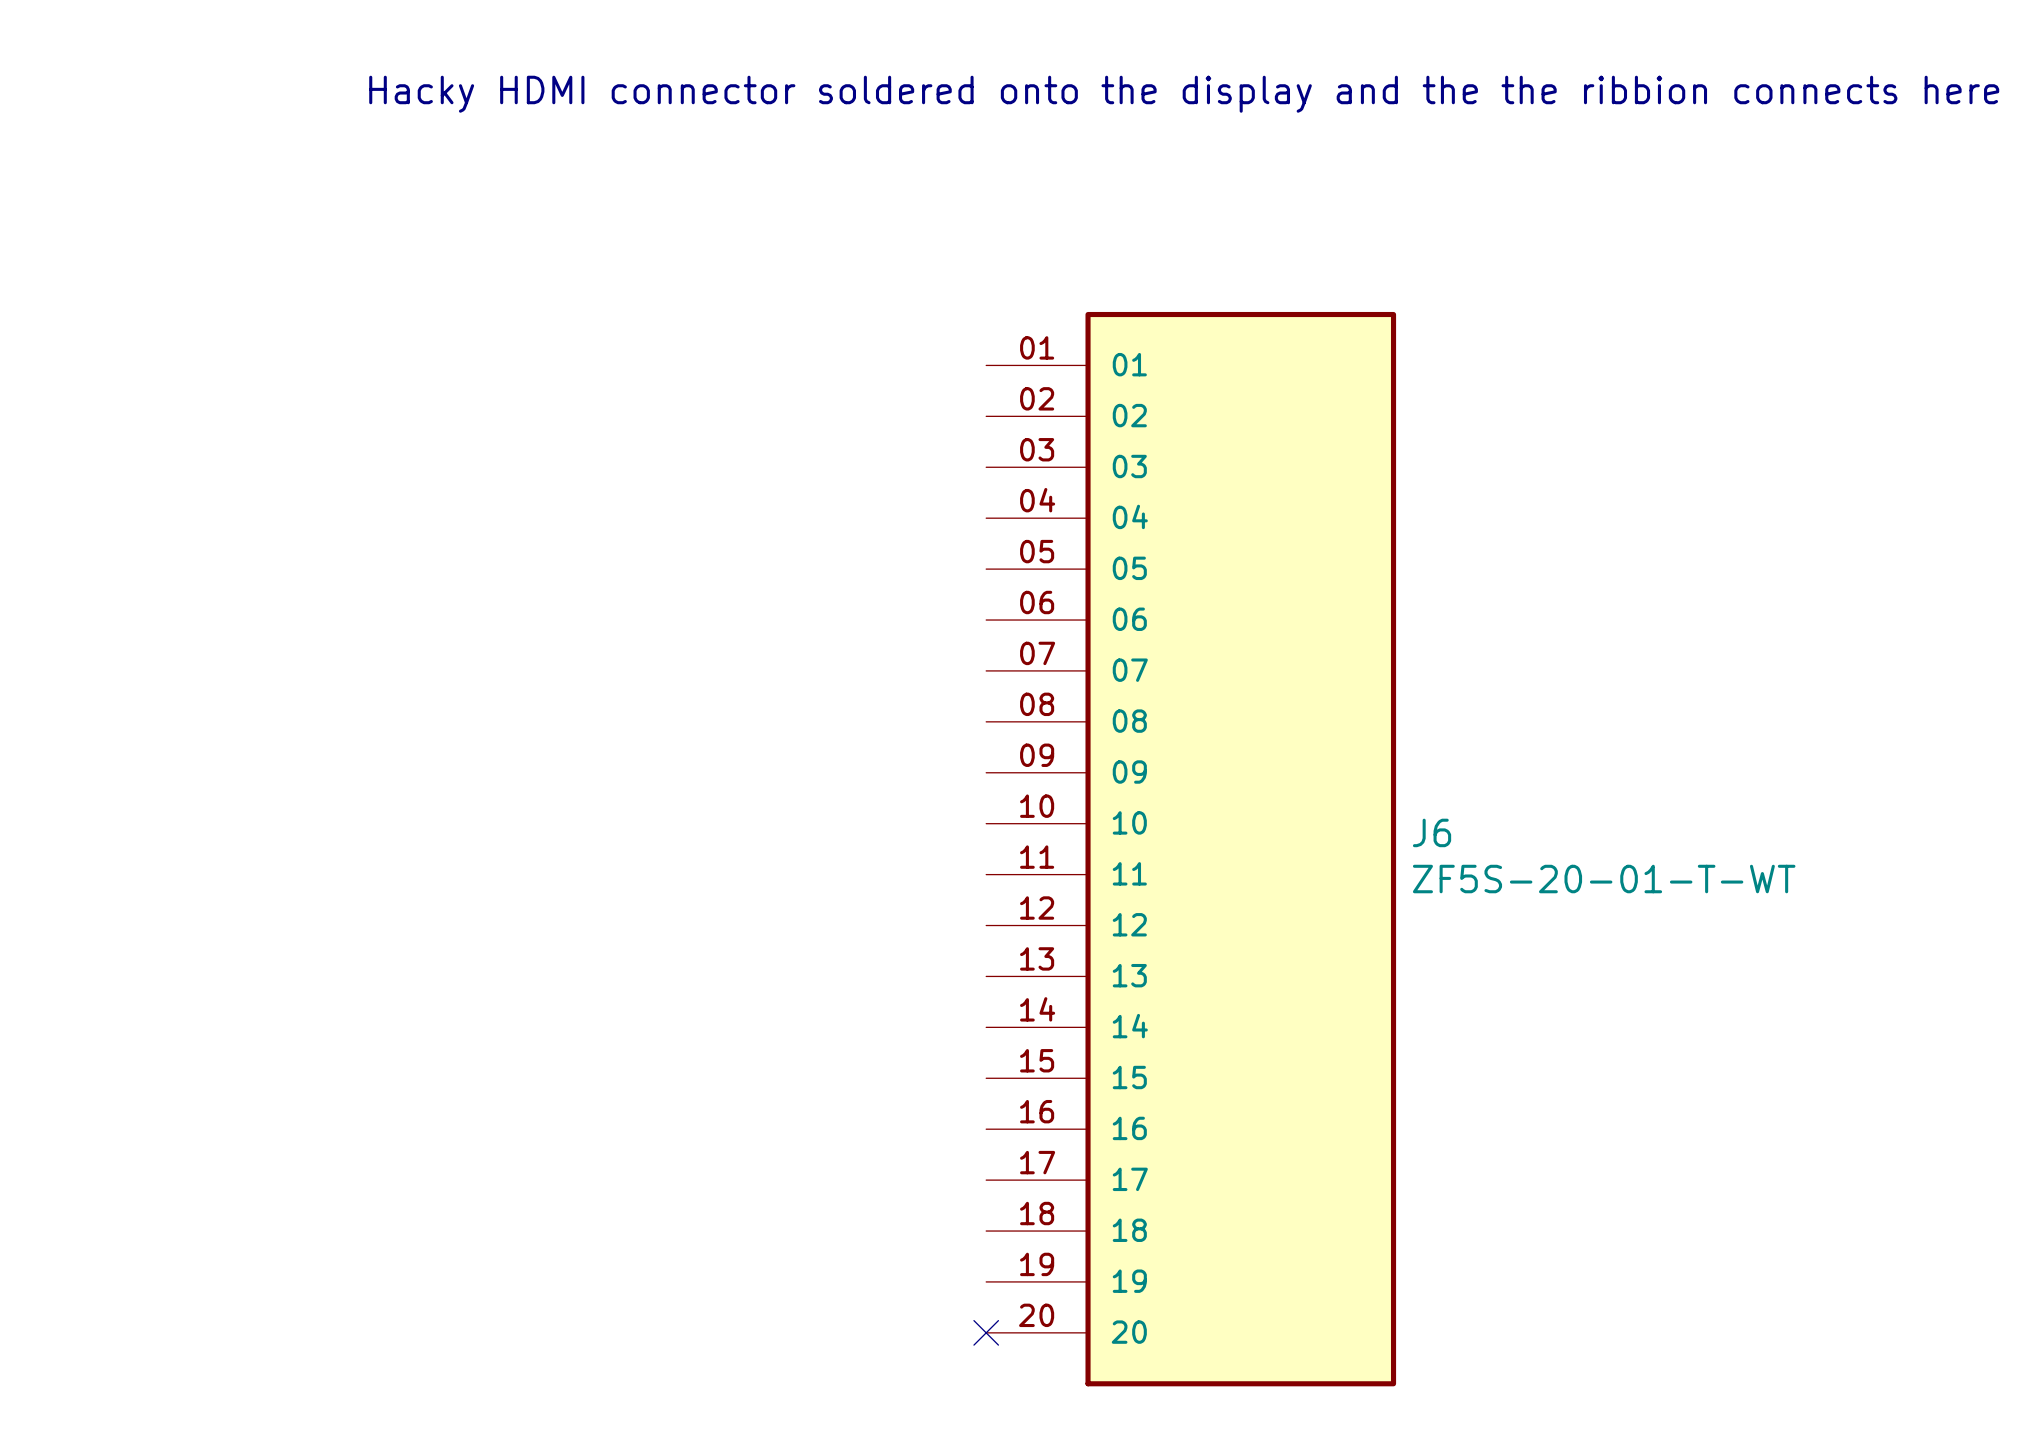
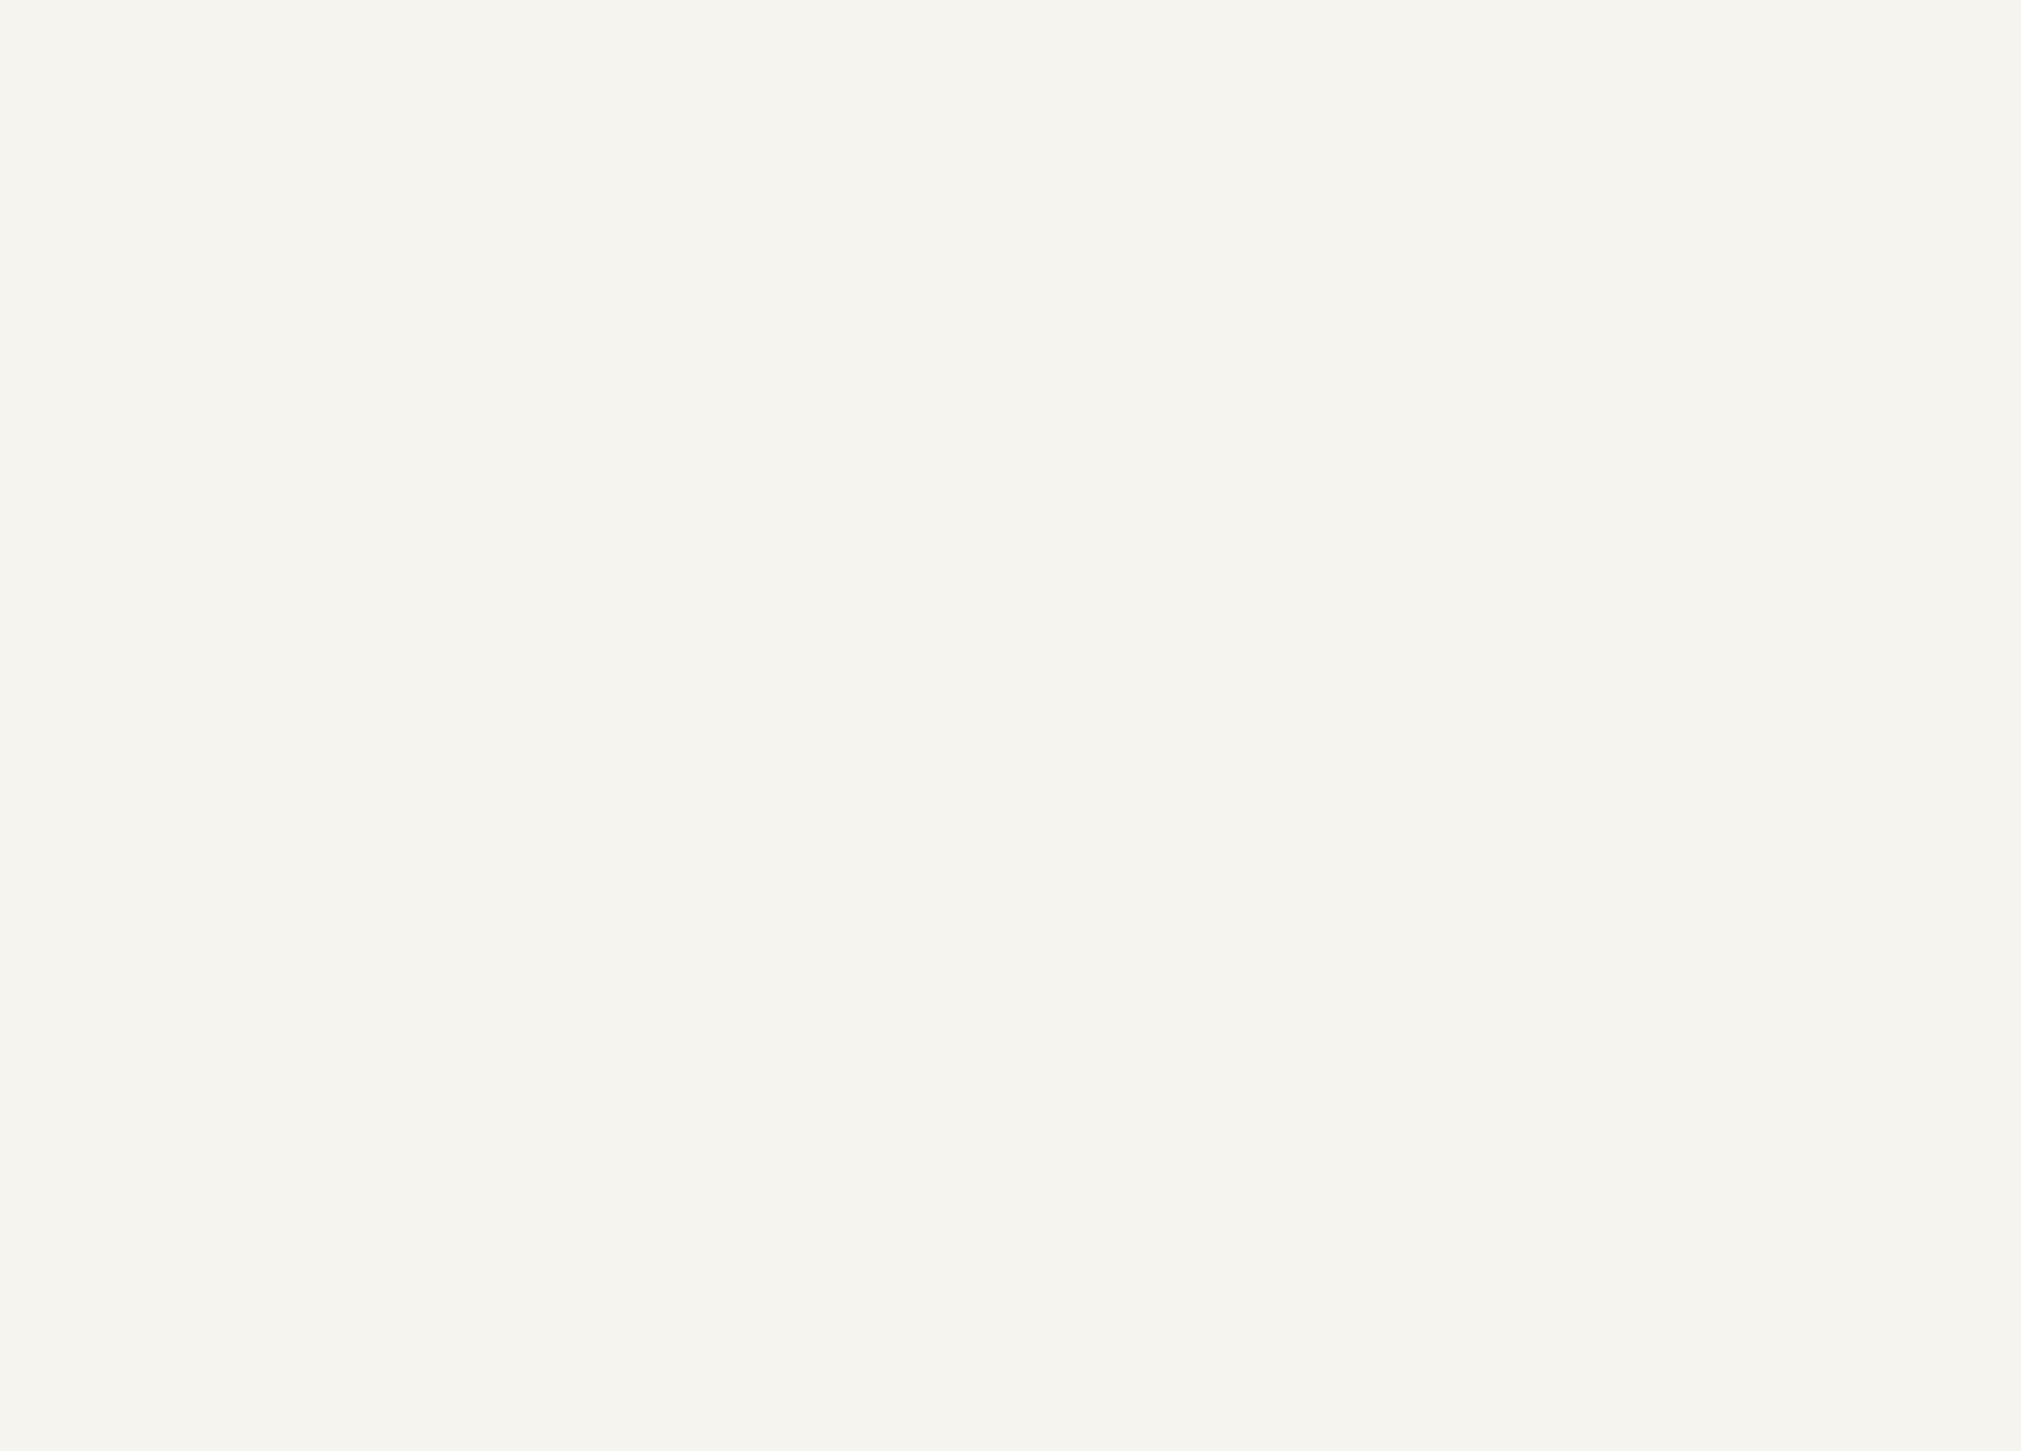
text: Hacky HDMI connector soldered onto the display and the the ribbion connects here (1184, 94) -> none
J6: ZF5S-20-01-T-WT (1191, 849) -> none
no-connect mark: (986, 1332) -> none

